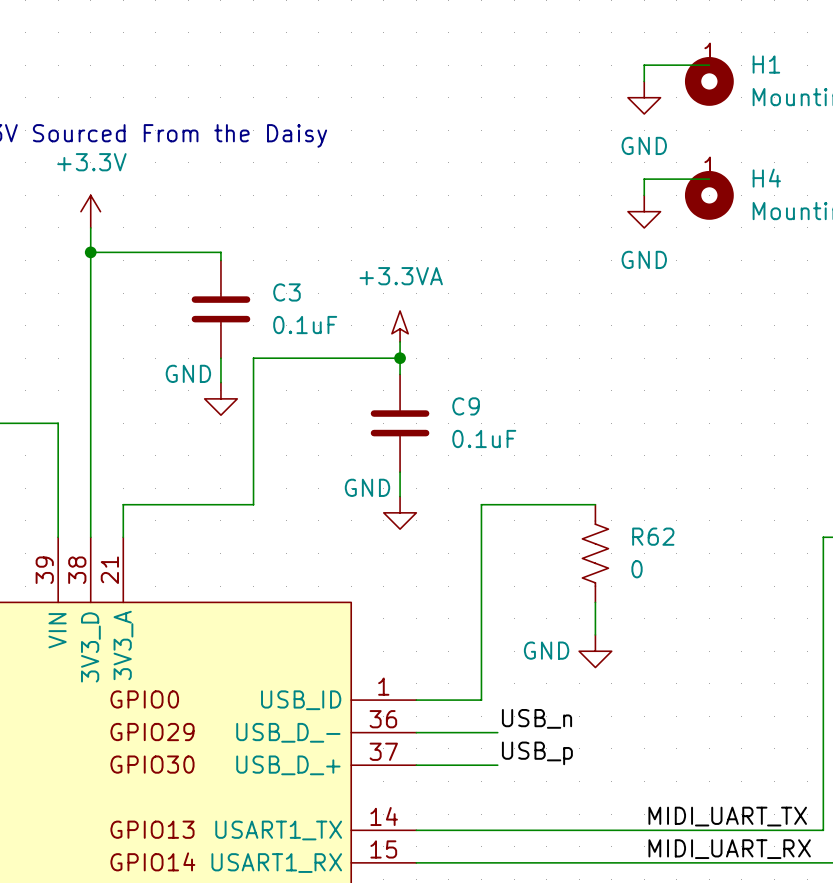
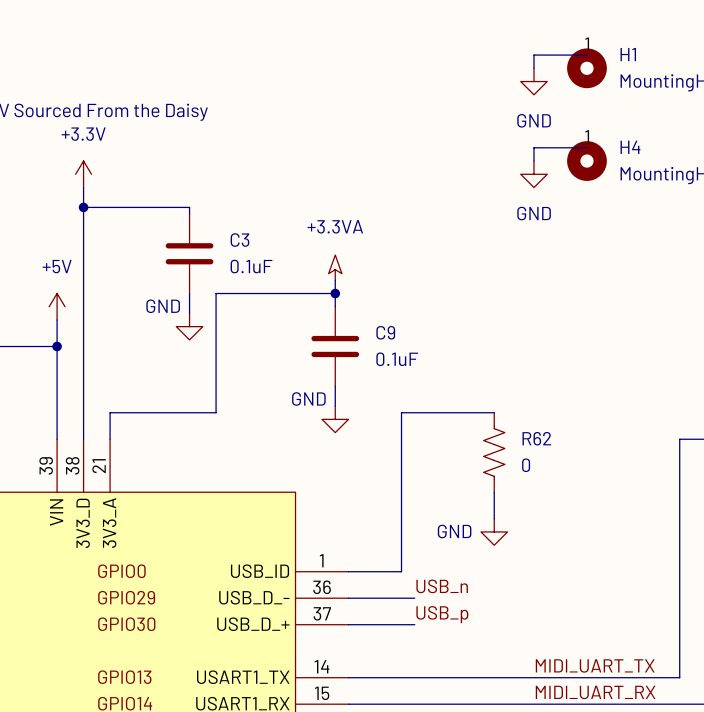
power symbol: none -> +5V (57, 306)
wire: none -> (57, 320) (57, 346)
junction: none -> (57, 346)

